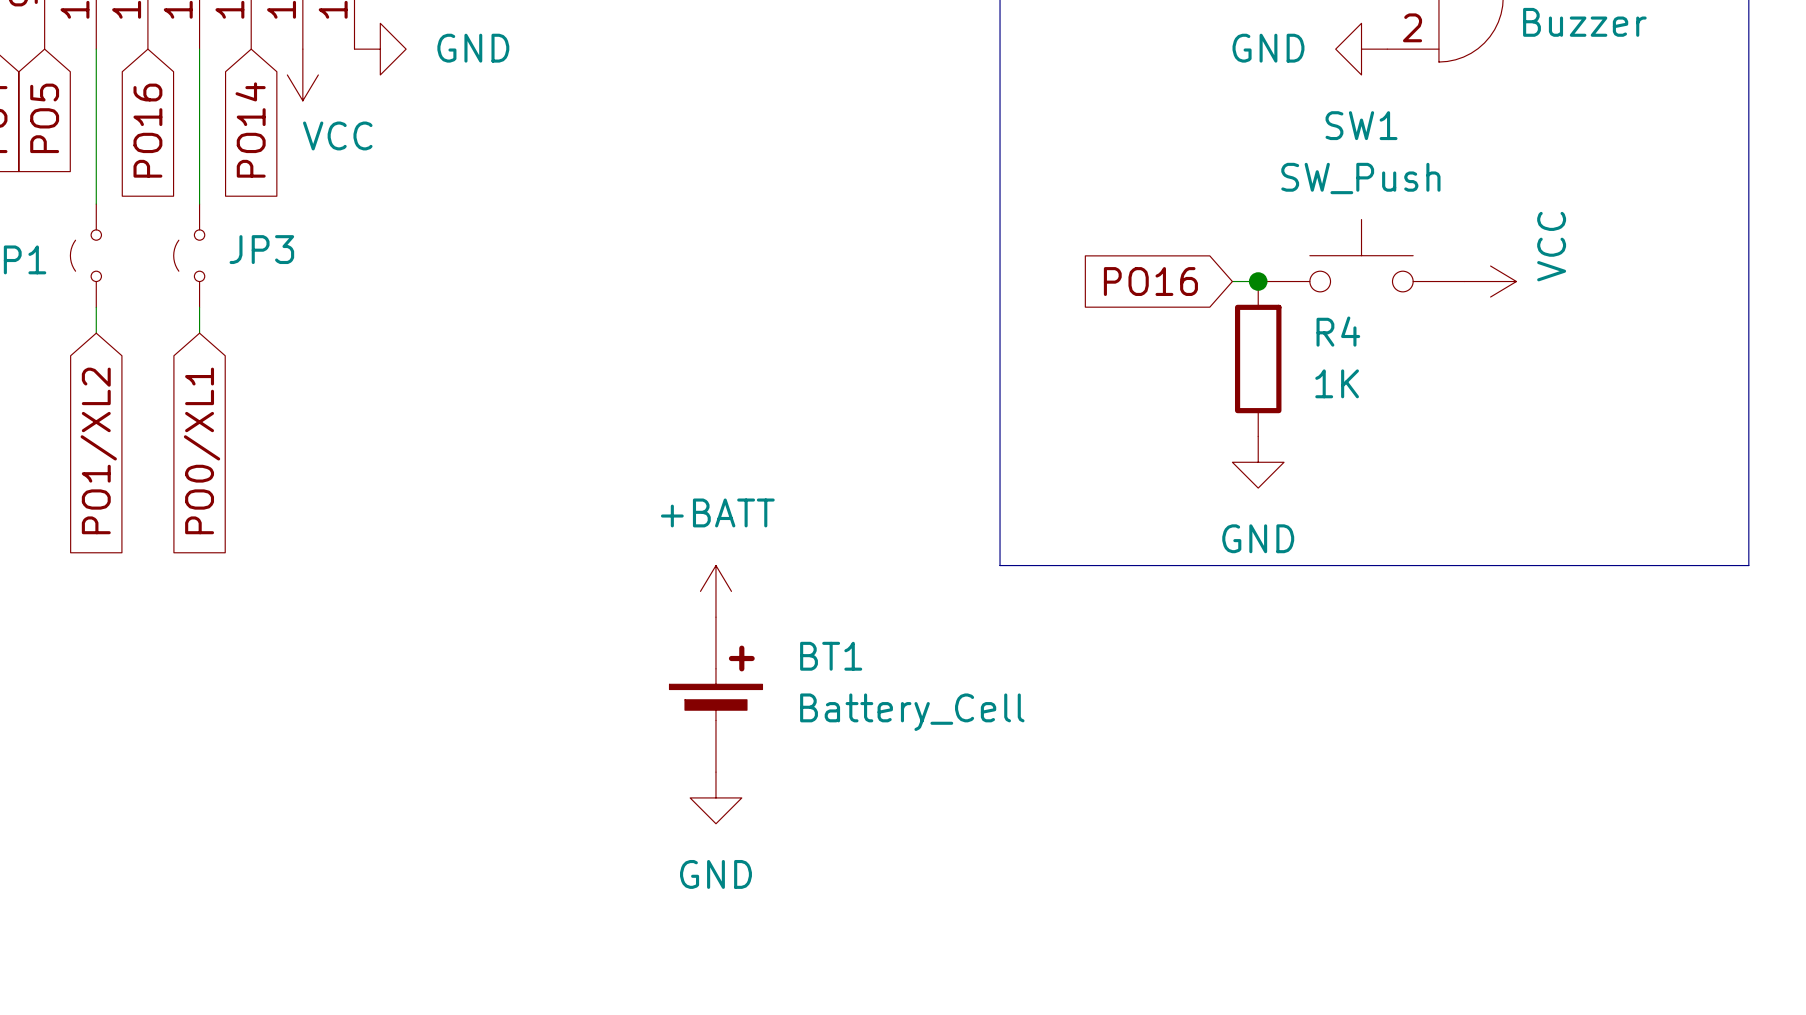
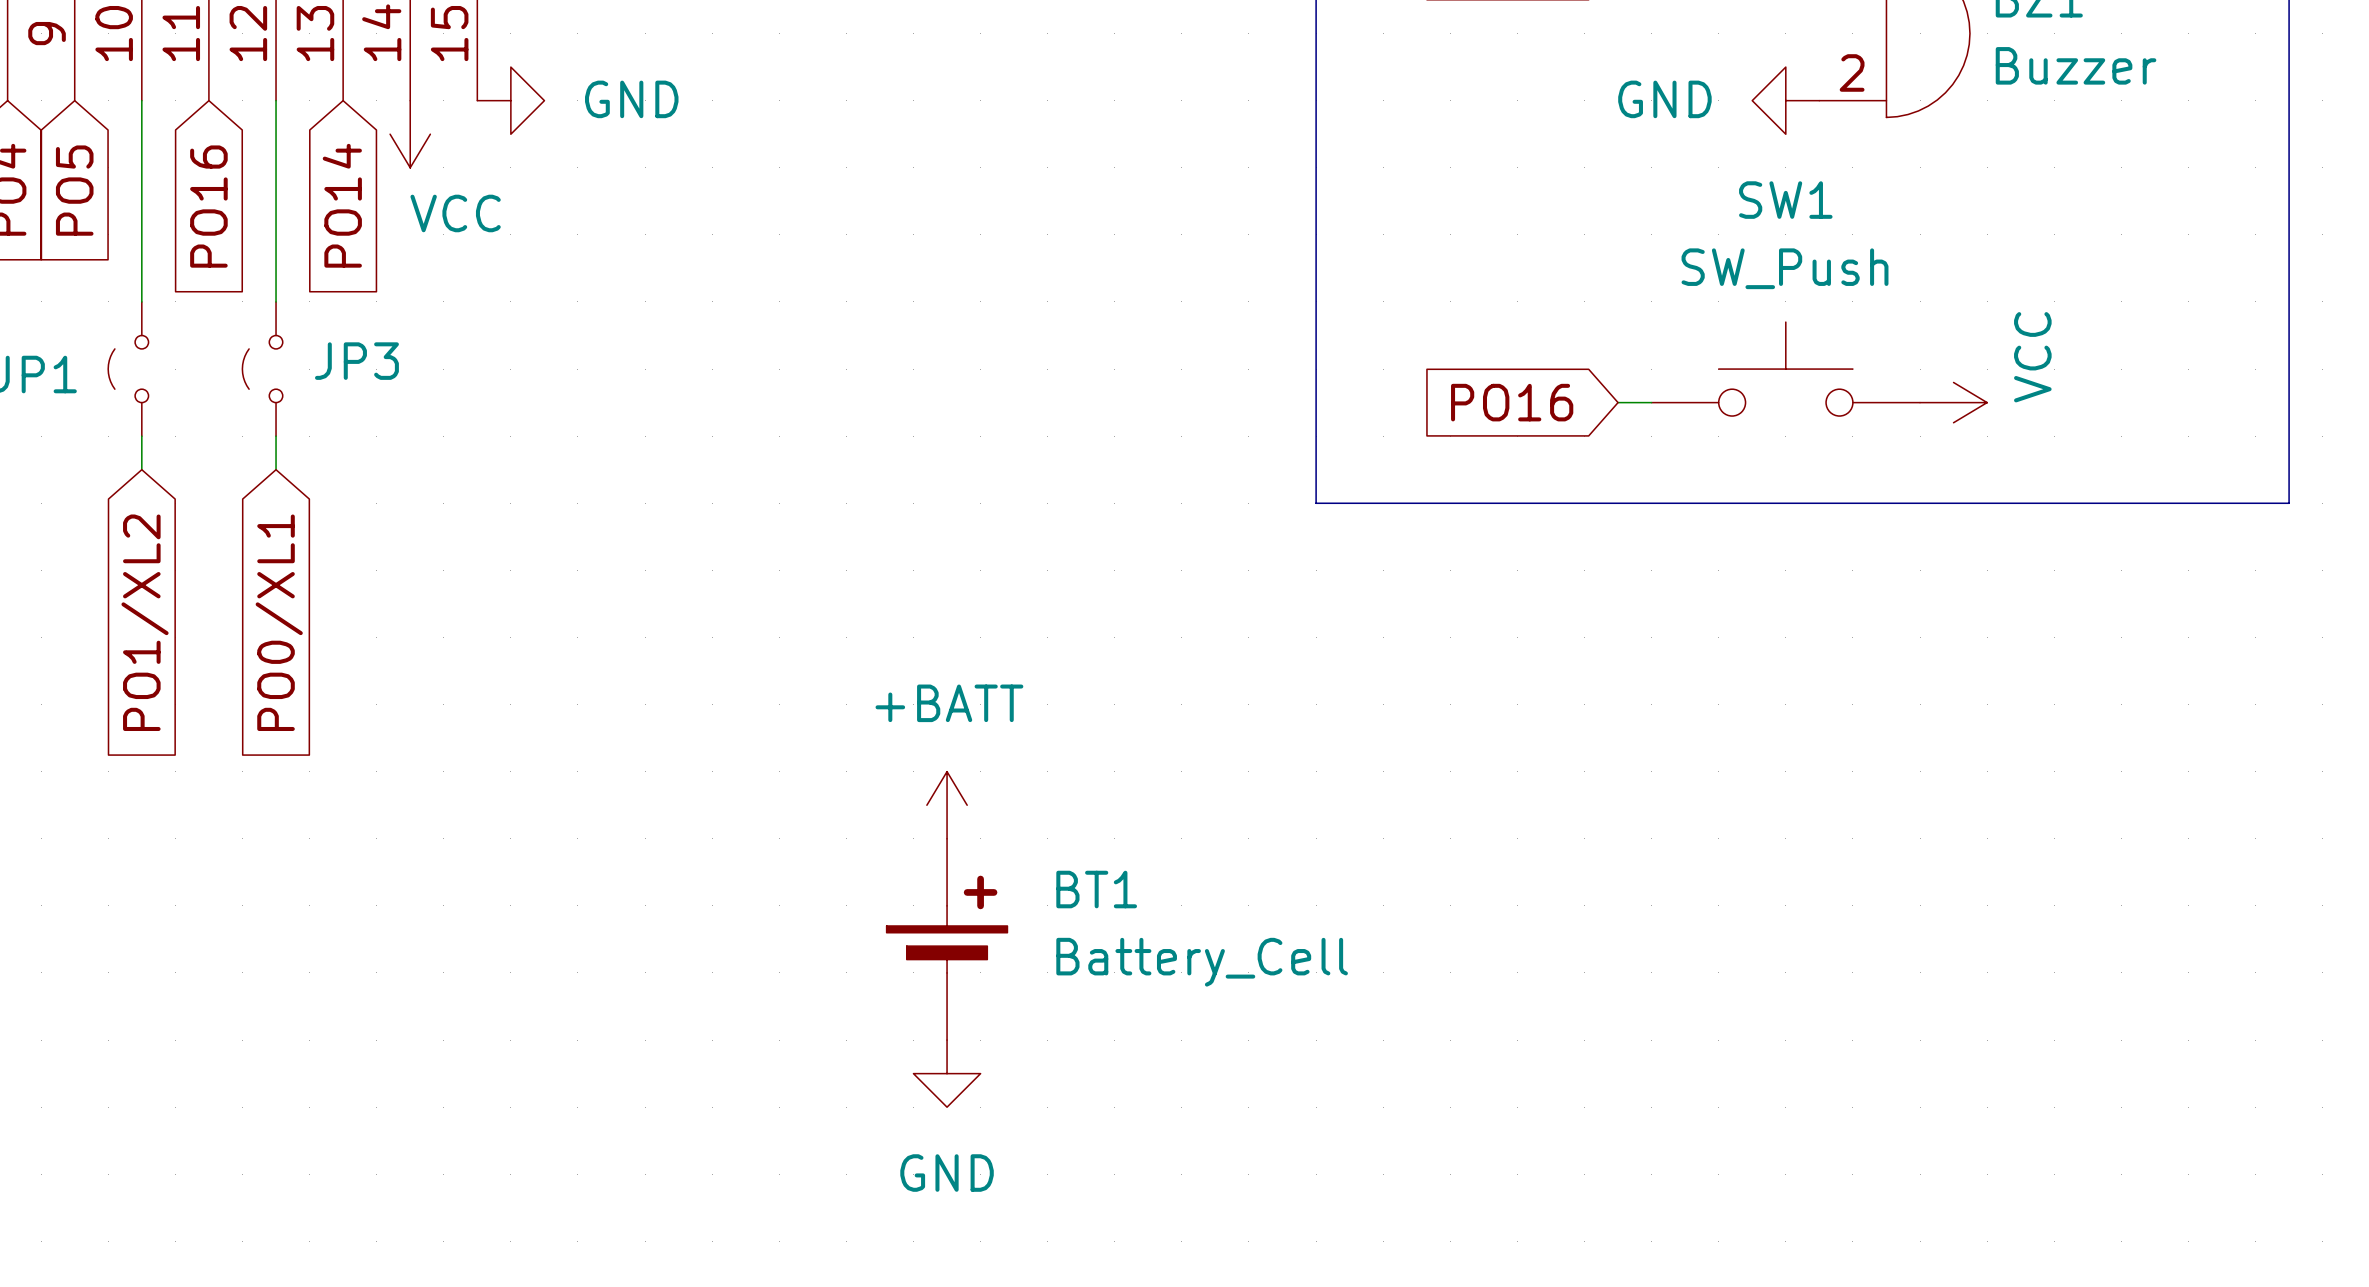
junction: (1258, 281) -> none
line: (1000, 358) (1000, 565) (1748, 565) (1748, 358) -> (1316, 503) (2289, 503)
R4: 1K (1258, 358) -> none
power symbol: GND (1258, 462) -> none

